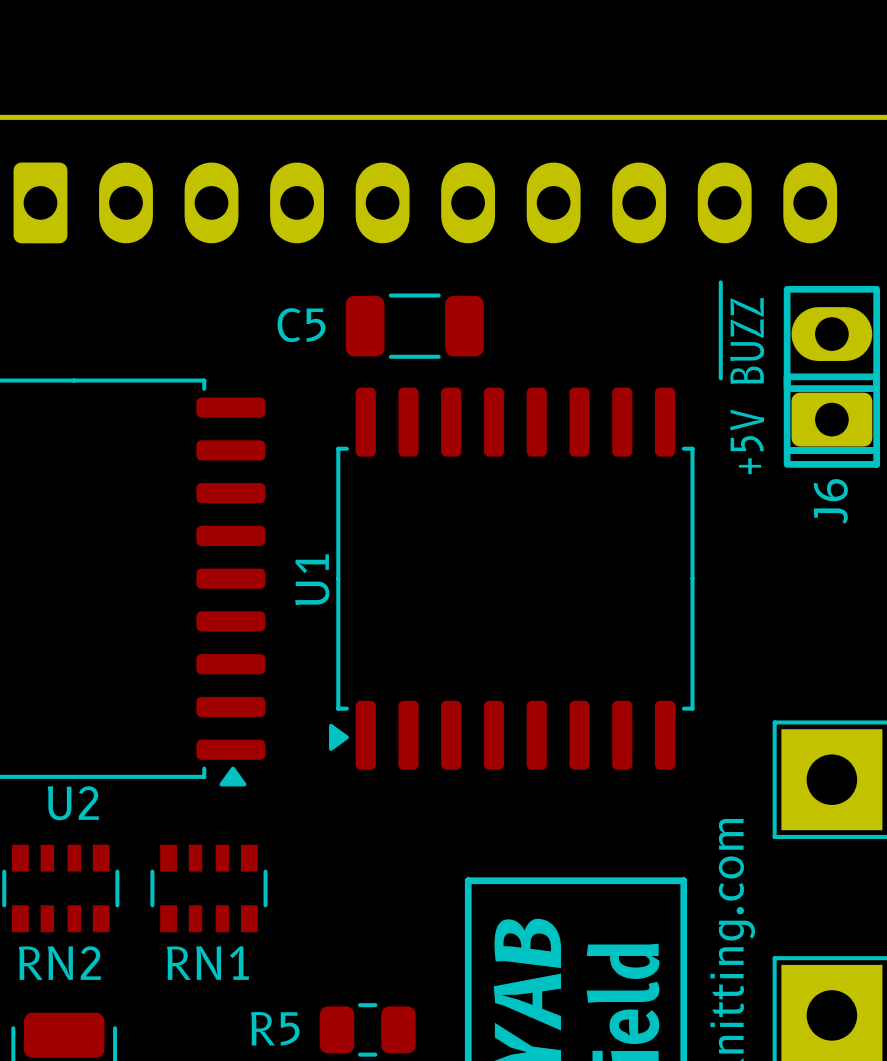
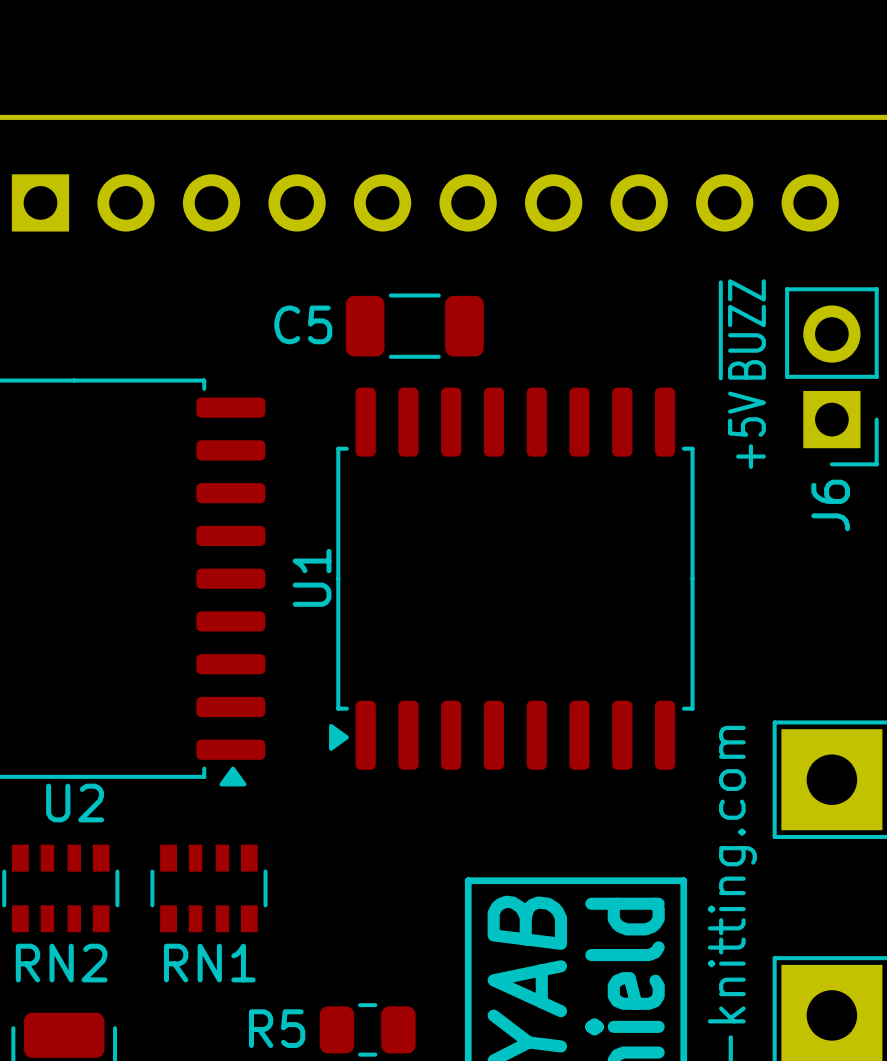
part footprint: [13, 162, 838, 244] -> [11, 174, 839, 232]
J6 footprint: [783, 285, 881, 468] -> [785, 287, 879, 467]

